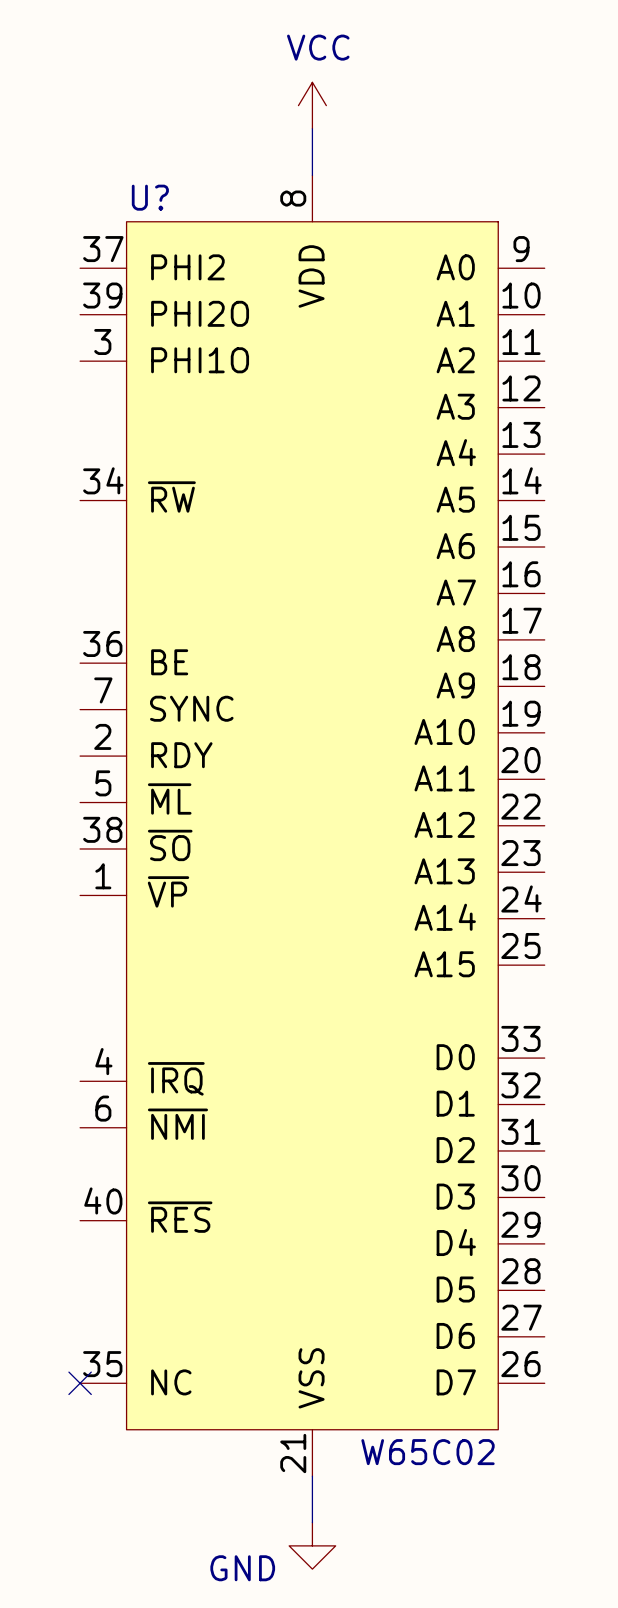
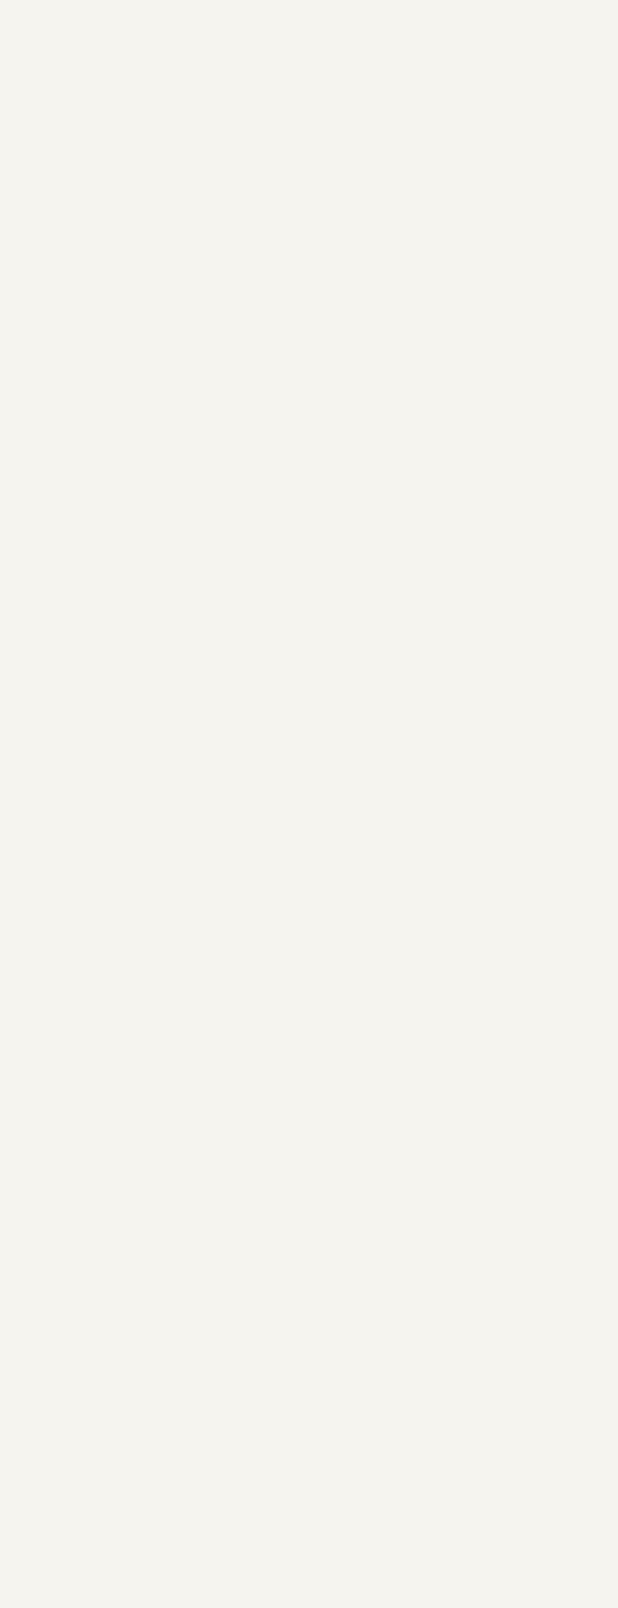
power symbol: VCC (312, 105) -> none
wire: (312, 128) (312, 175) -> none
U?: W65C02 (312, 825) -> none
no-connect mark: (80, 1383) -> none
wire: (312, 1476) (312, 1522) -> none
power symbol: GND (312, 1545) -> none

